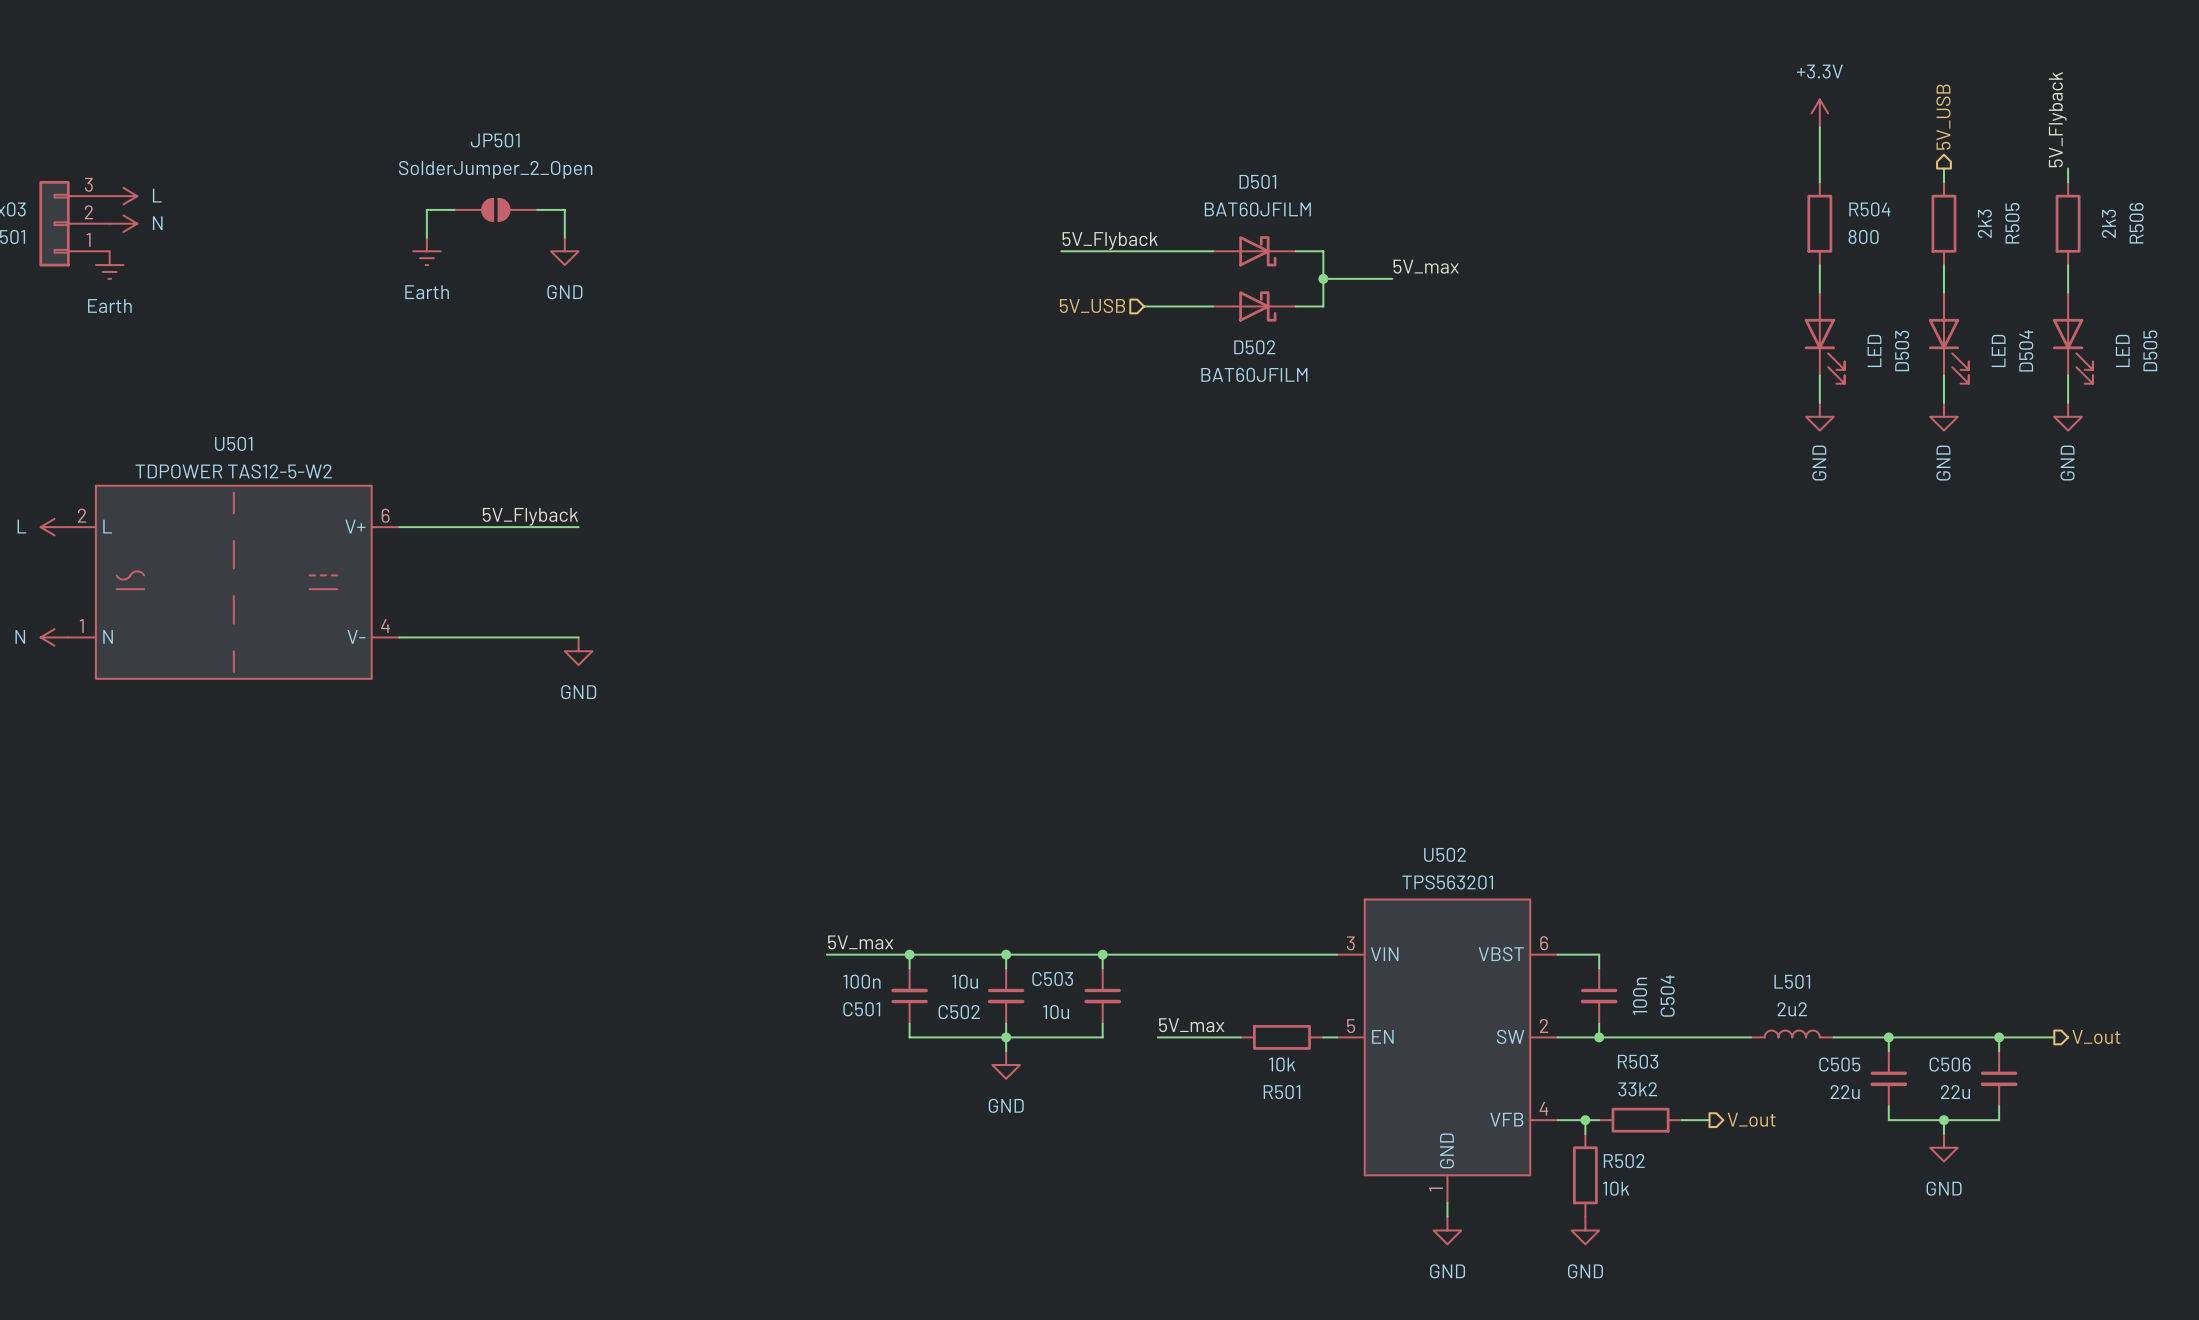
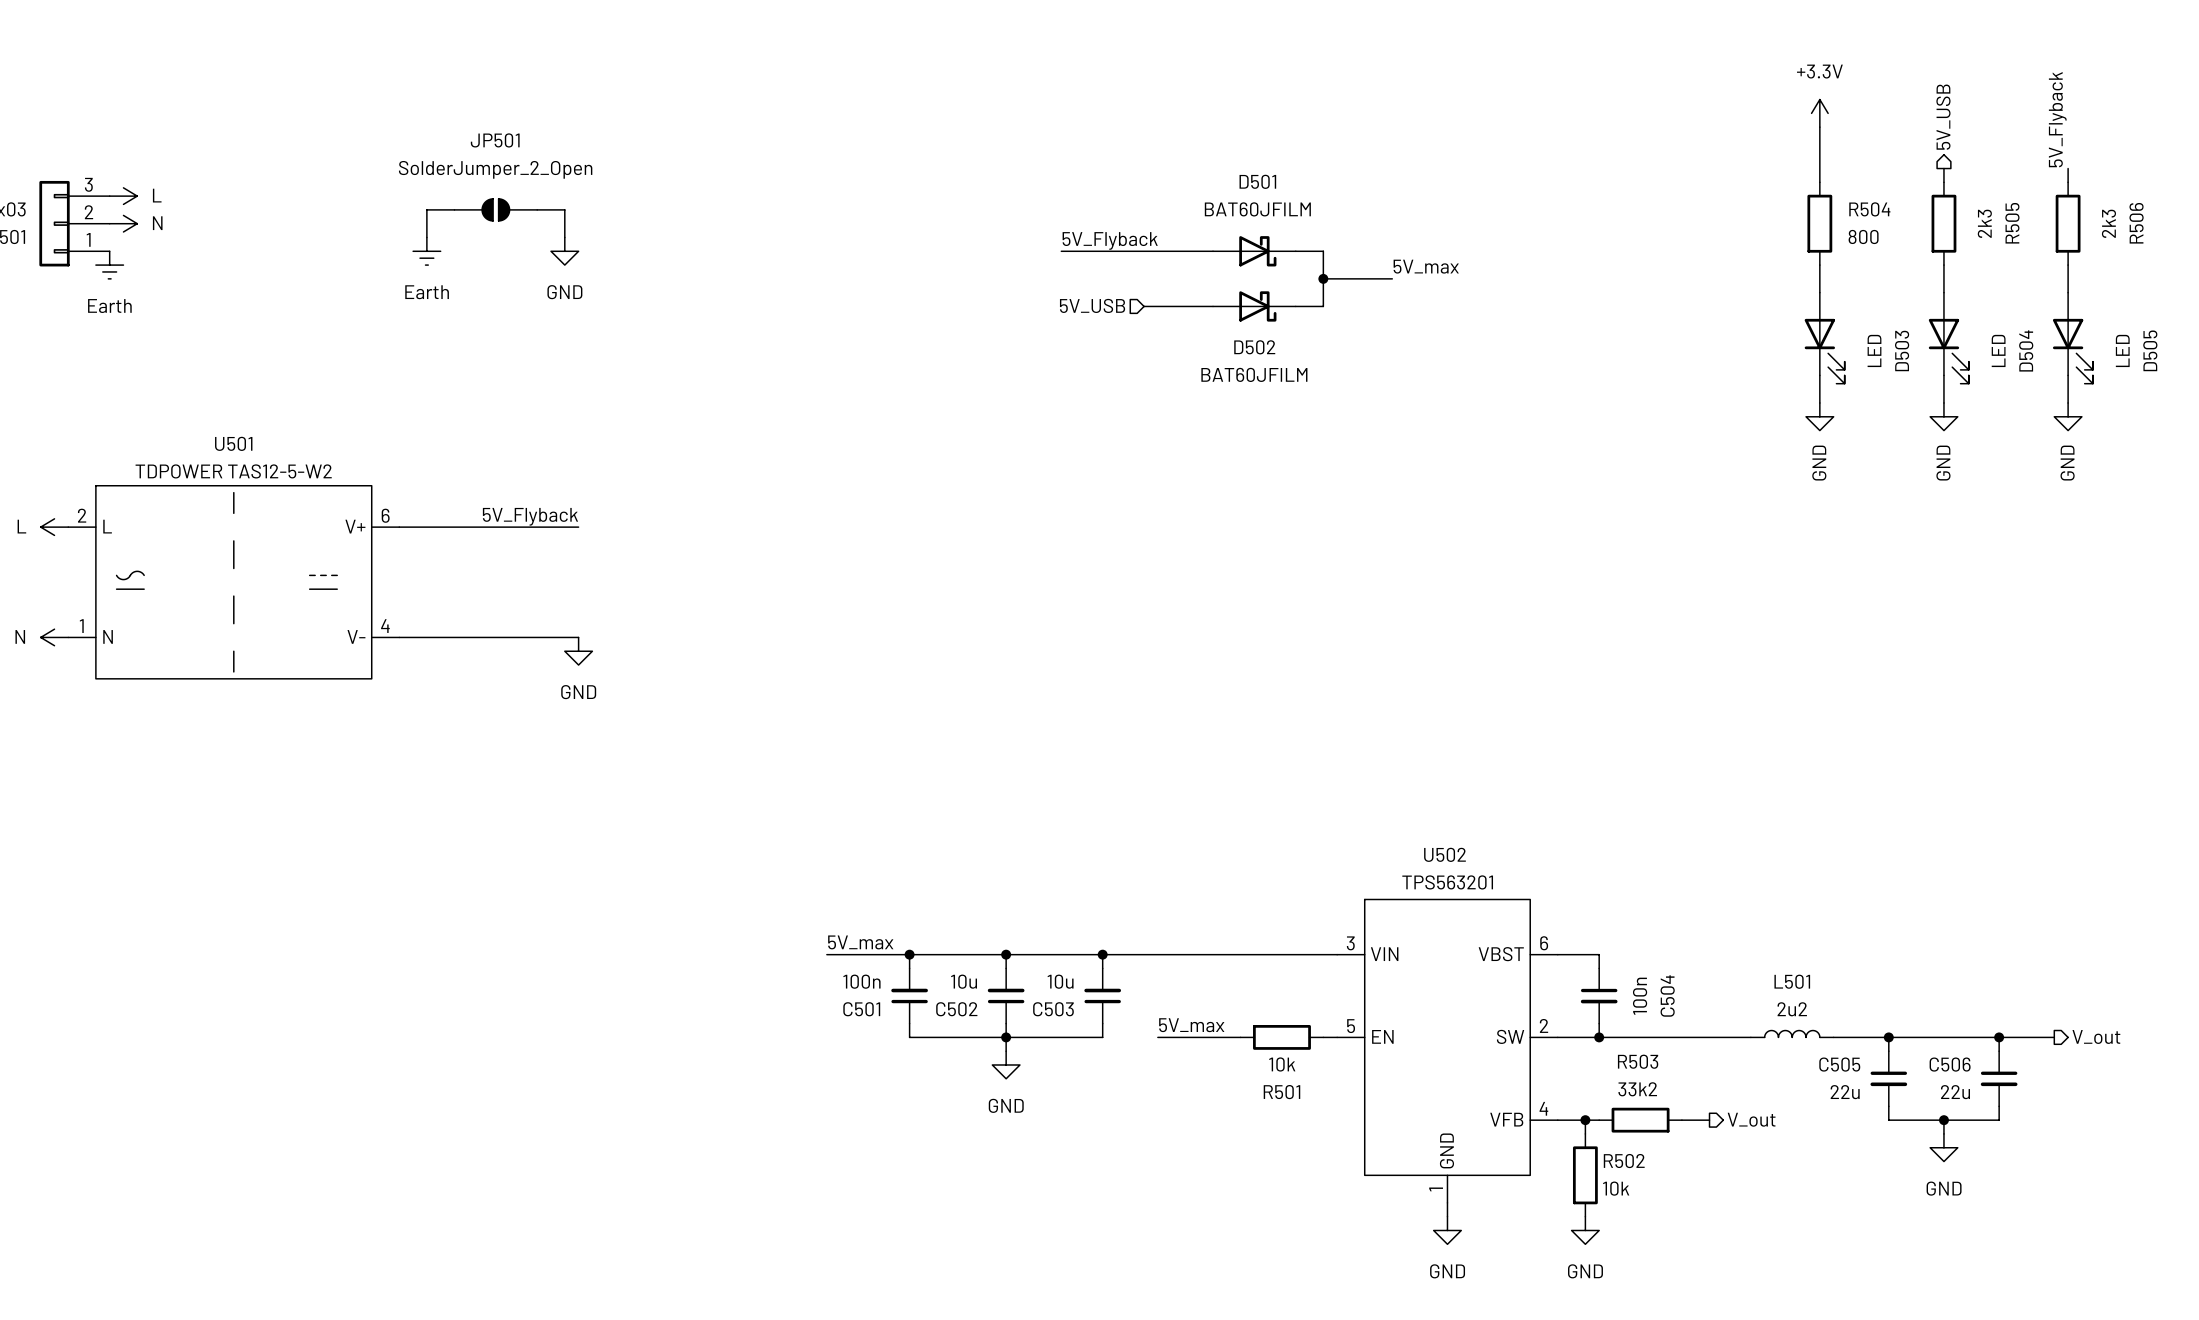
C503 name position: C503 (1052, 978) -> C503 (1053, 1009)
C502 rotation: 0° (1006, 996) -> 180° (1006, 995)
C503 rotation: 0° (1102, 996) -> 180° (1102, 995)
C503 value position: 10u (1056, 1012) -> 10u (1060, 981)

